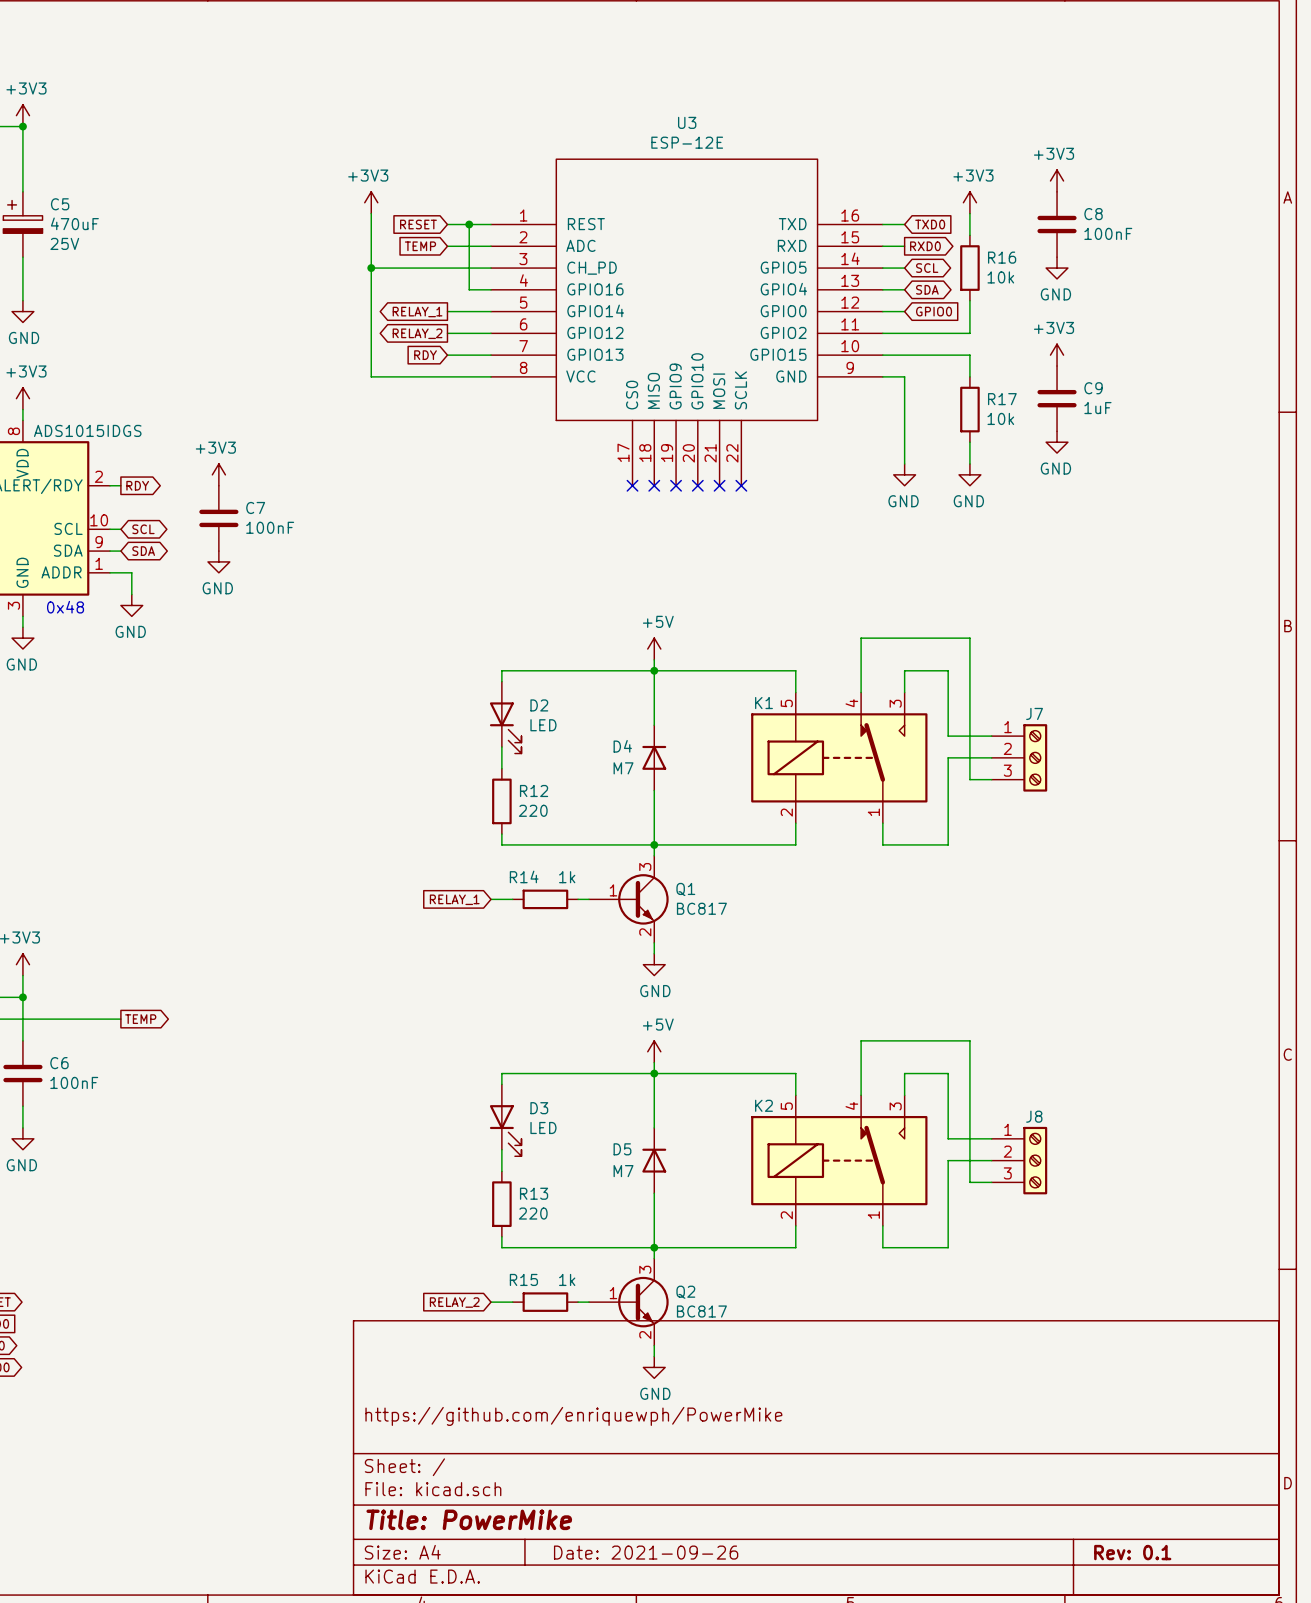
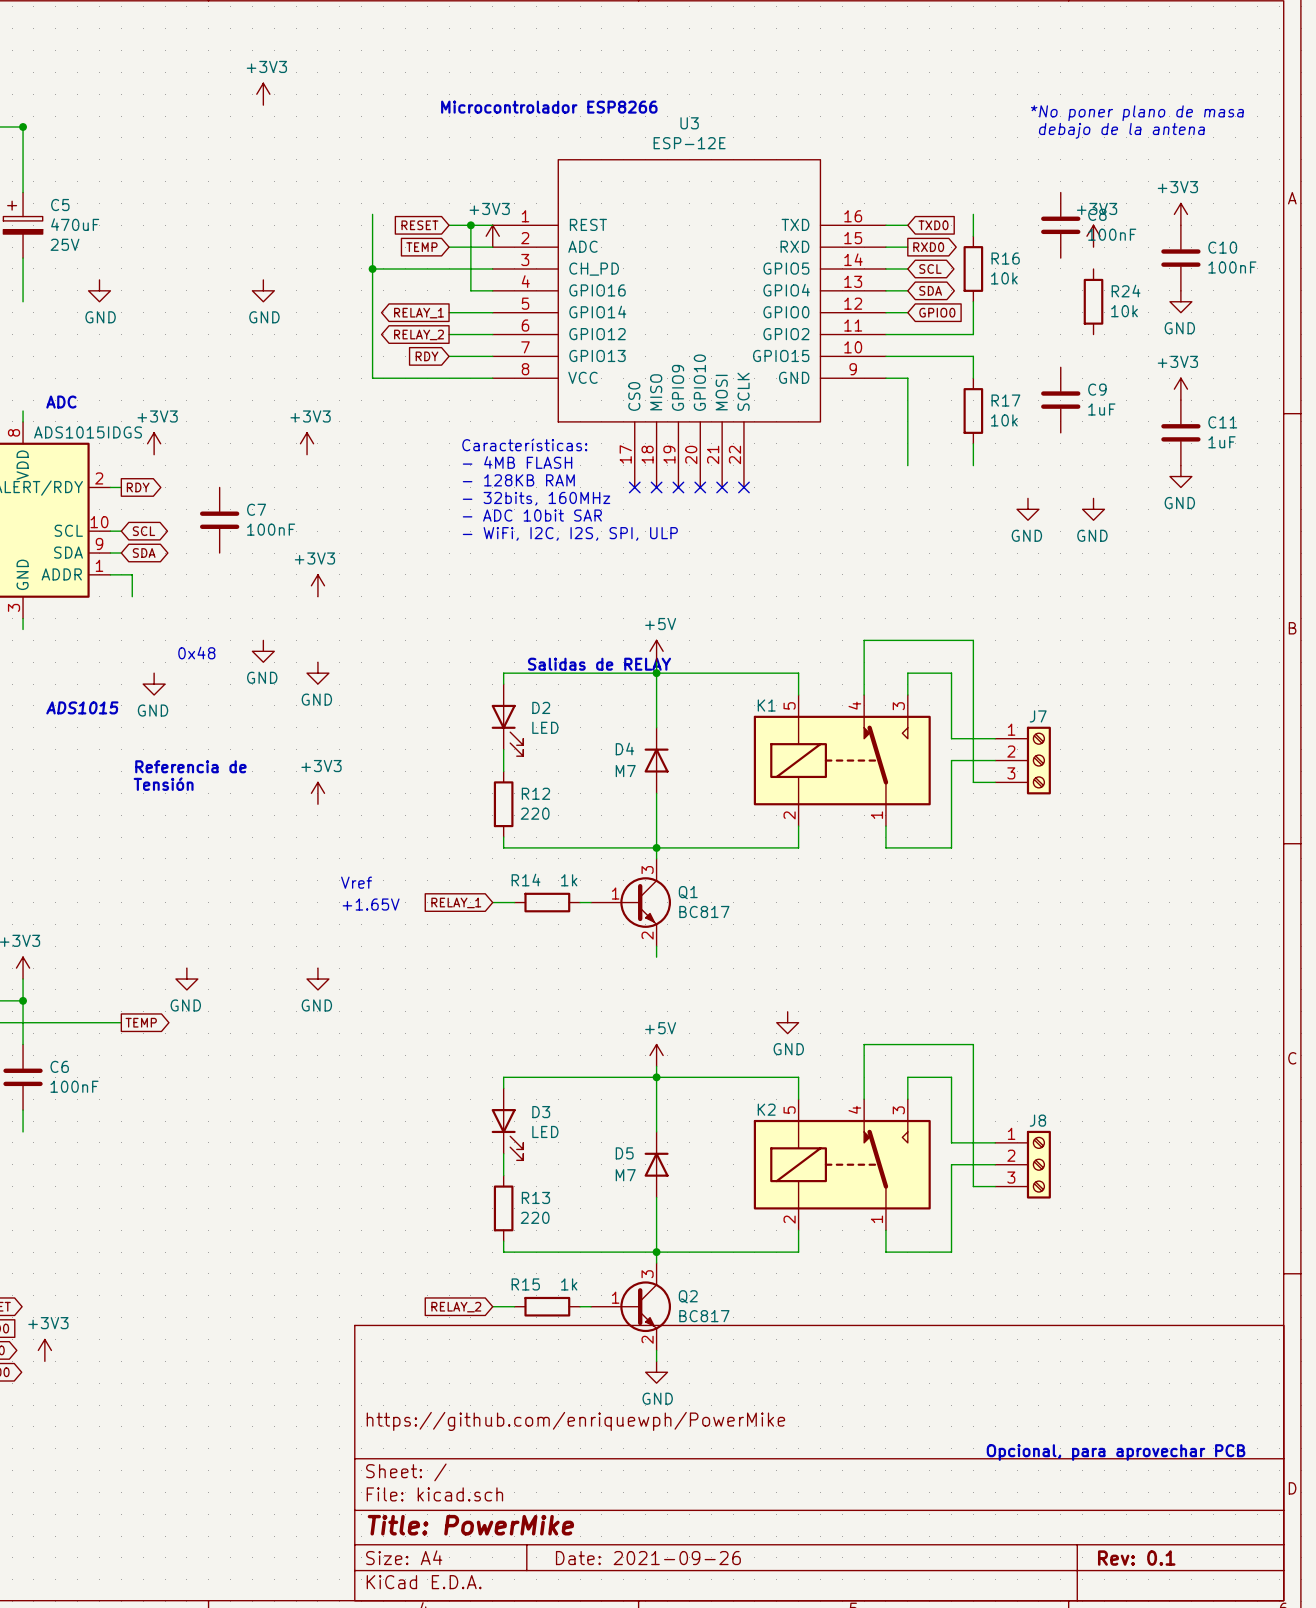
power symbol: none -> +3V3 (263, 94)
text: none -> Microcontrolador ESP8266 (549, 107)
text: none -> *No poner plano de masa (1137, 113)
power symbol: +3V3 (22, 115) -> none
text: none -> debajo de la antena (1121, 130)
power symbol: +3V3 (1057, 180) -> none
power symbol: +3V3 (371, 202) -> none
power symbol: +3V3 (969, 202) -> none
power symbol: none -> +3V3 (1180, 214)
power symbol: none -> +3V3 (492, 236)
power symbol: none -> +3V3 (1093, 236)
C10: none -> 100nF (1180, 258)
power symbol: GND (1057, 268) -> none
power symbol: none -> GND (99, 290)
power symbol: none -> GND (263, 290)
R24: none -> 10k (1093, 301)
power symbol: none -> GND (1180, 301)
power symbol: GND (22, 311) -> none
power symbol: +3V3 (1057, 355) -> none
power symbol: none -> +3V3 (1180, 389)
power symbol: +3V3 (22, 398) -> none
text: none -> ADC (61, 402)
C11: none -> 1uF (1180, 432)
power symbol: none -> +3V3 (154, 443)
power symbol: none -> +3V3 (307, 443)
power symbol: GND (1057, 442) -> none
text: none -> Características: (524, 444)
text: none -> - 4MB FLASH (517, 462)
power symbol: +3V3 (218, 474) -> none
power symbol: GND (904, 474) -> none
power symbol: GND (969, 474) -> none
power symbol: none -> GND (1180, 476)
text: none -> - 128KB RAM (518, 480)
text: none -> - 32bits, 160MHz (536, 498)
power symbol: none -> GND (1027, 509)
power symbol: none -> GND (1093, 509)
text: none -> - ADC 10bit SAR (532, 515)
text: none -> - WiFi, I2C, I2S, SPI, ULP (570, 533)
power symbol: GND (218, 561) -> none
power symbol: none -> +3V3 (317, 585)
power symbol: GND (131, 605) -> none
text position: 0x48 (65, 607) -> 0x48 (196, 653)
power symbol: GND (22, 638) -> none
power symbol: none -> GND (263, 651)
text: none -> Salidas de RELAY (599, 664)
power symbol: none -> GND (317, 673)
power symbol: none -> GND (154, 684)
text: none -> ADS1015 (82, 707)
text: none -> Referencia de (190, 766)
text: none -> Tensión (163, 784)
power symbol: none -> +3V3 (317, 793)
text: none -> Vref (356, 882)
text: none -> +1.65V (371, 904)
power symbol position: GND (654, 964) -> GND (787, 1022)
power symbol: none -> GND (186, 979)
power symbol: none -> GND (317, 979)
power symbol: GND (22, 1138) -> none
power symbol: none -> +3V3 (44, 1350)
text: none -> Opcional, para aprovechar PCB (1116, 1452)

